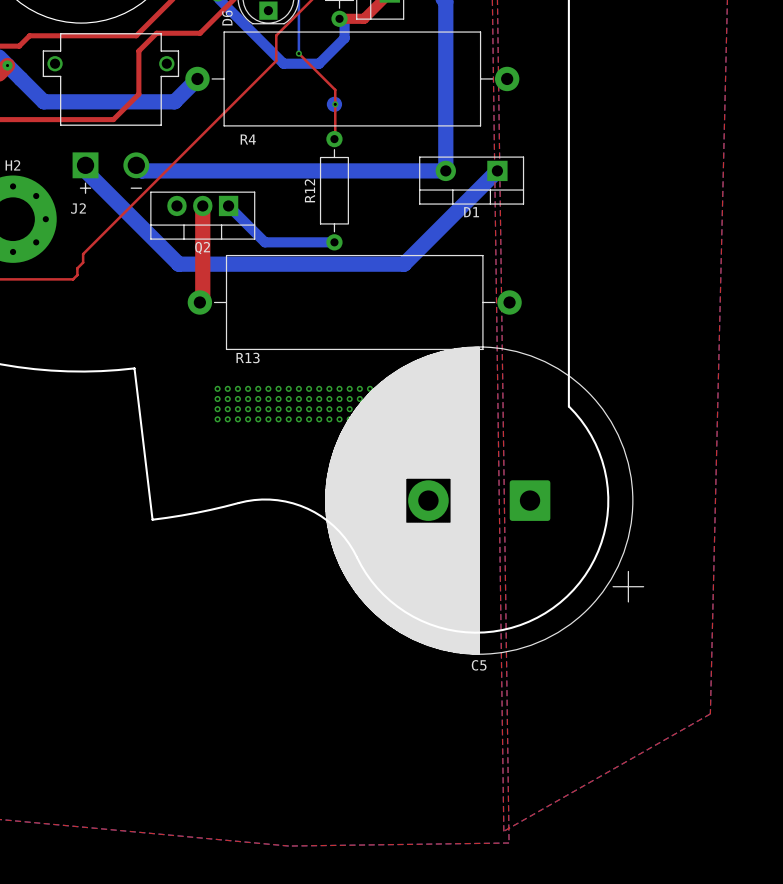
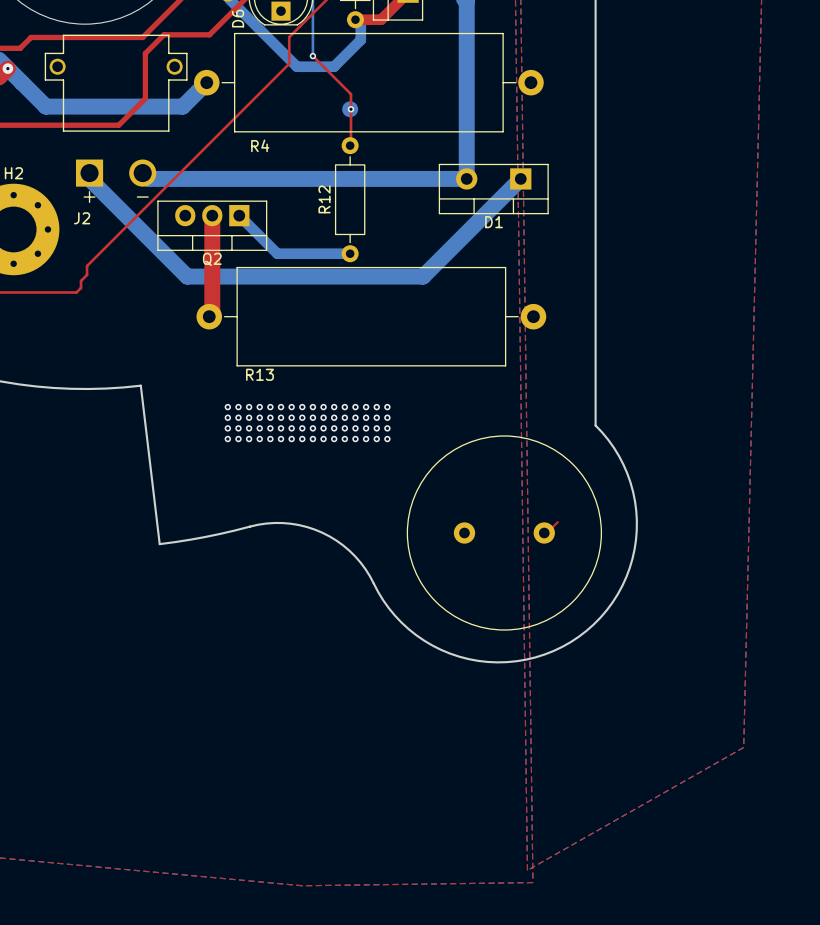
C5: (484, 500) -> none
part: none -> (504, 533)

